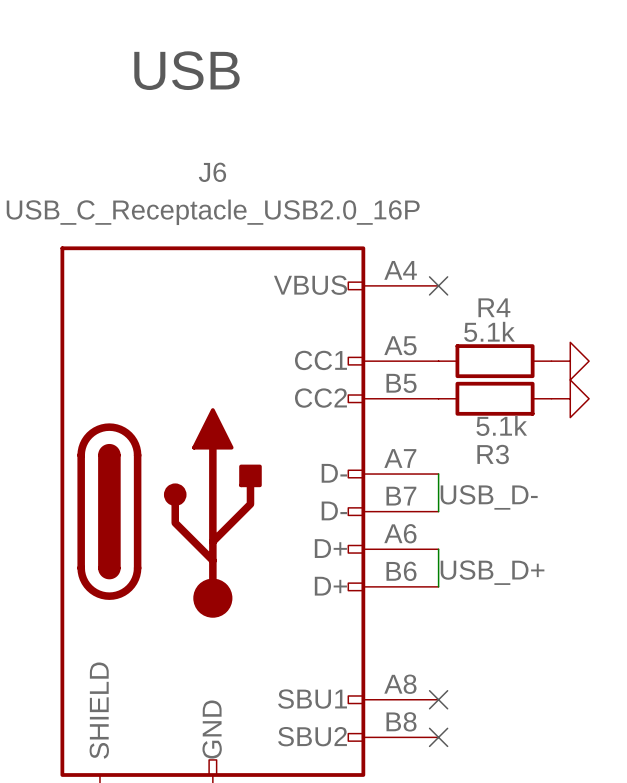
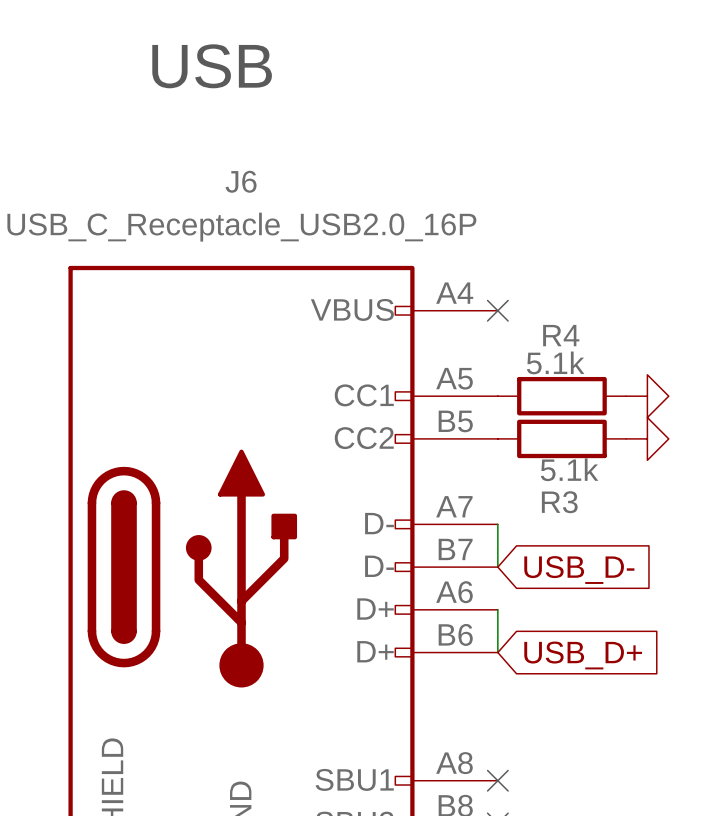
label: USB_D- (489, 497) -> none
global label: none -> USB_D- (579, 570)
label: USB_D+ (492, 572) -> none
global label: none -> USB_D+ (583, 655)

